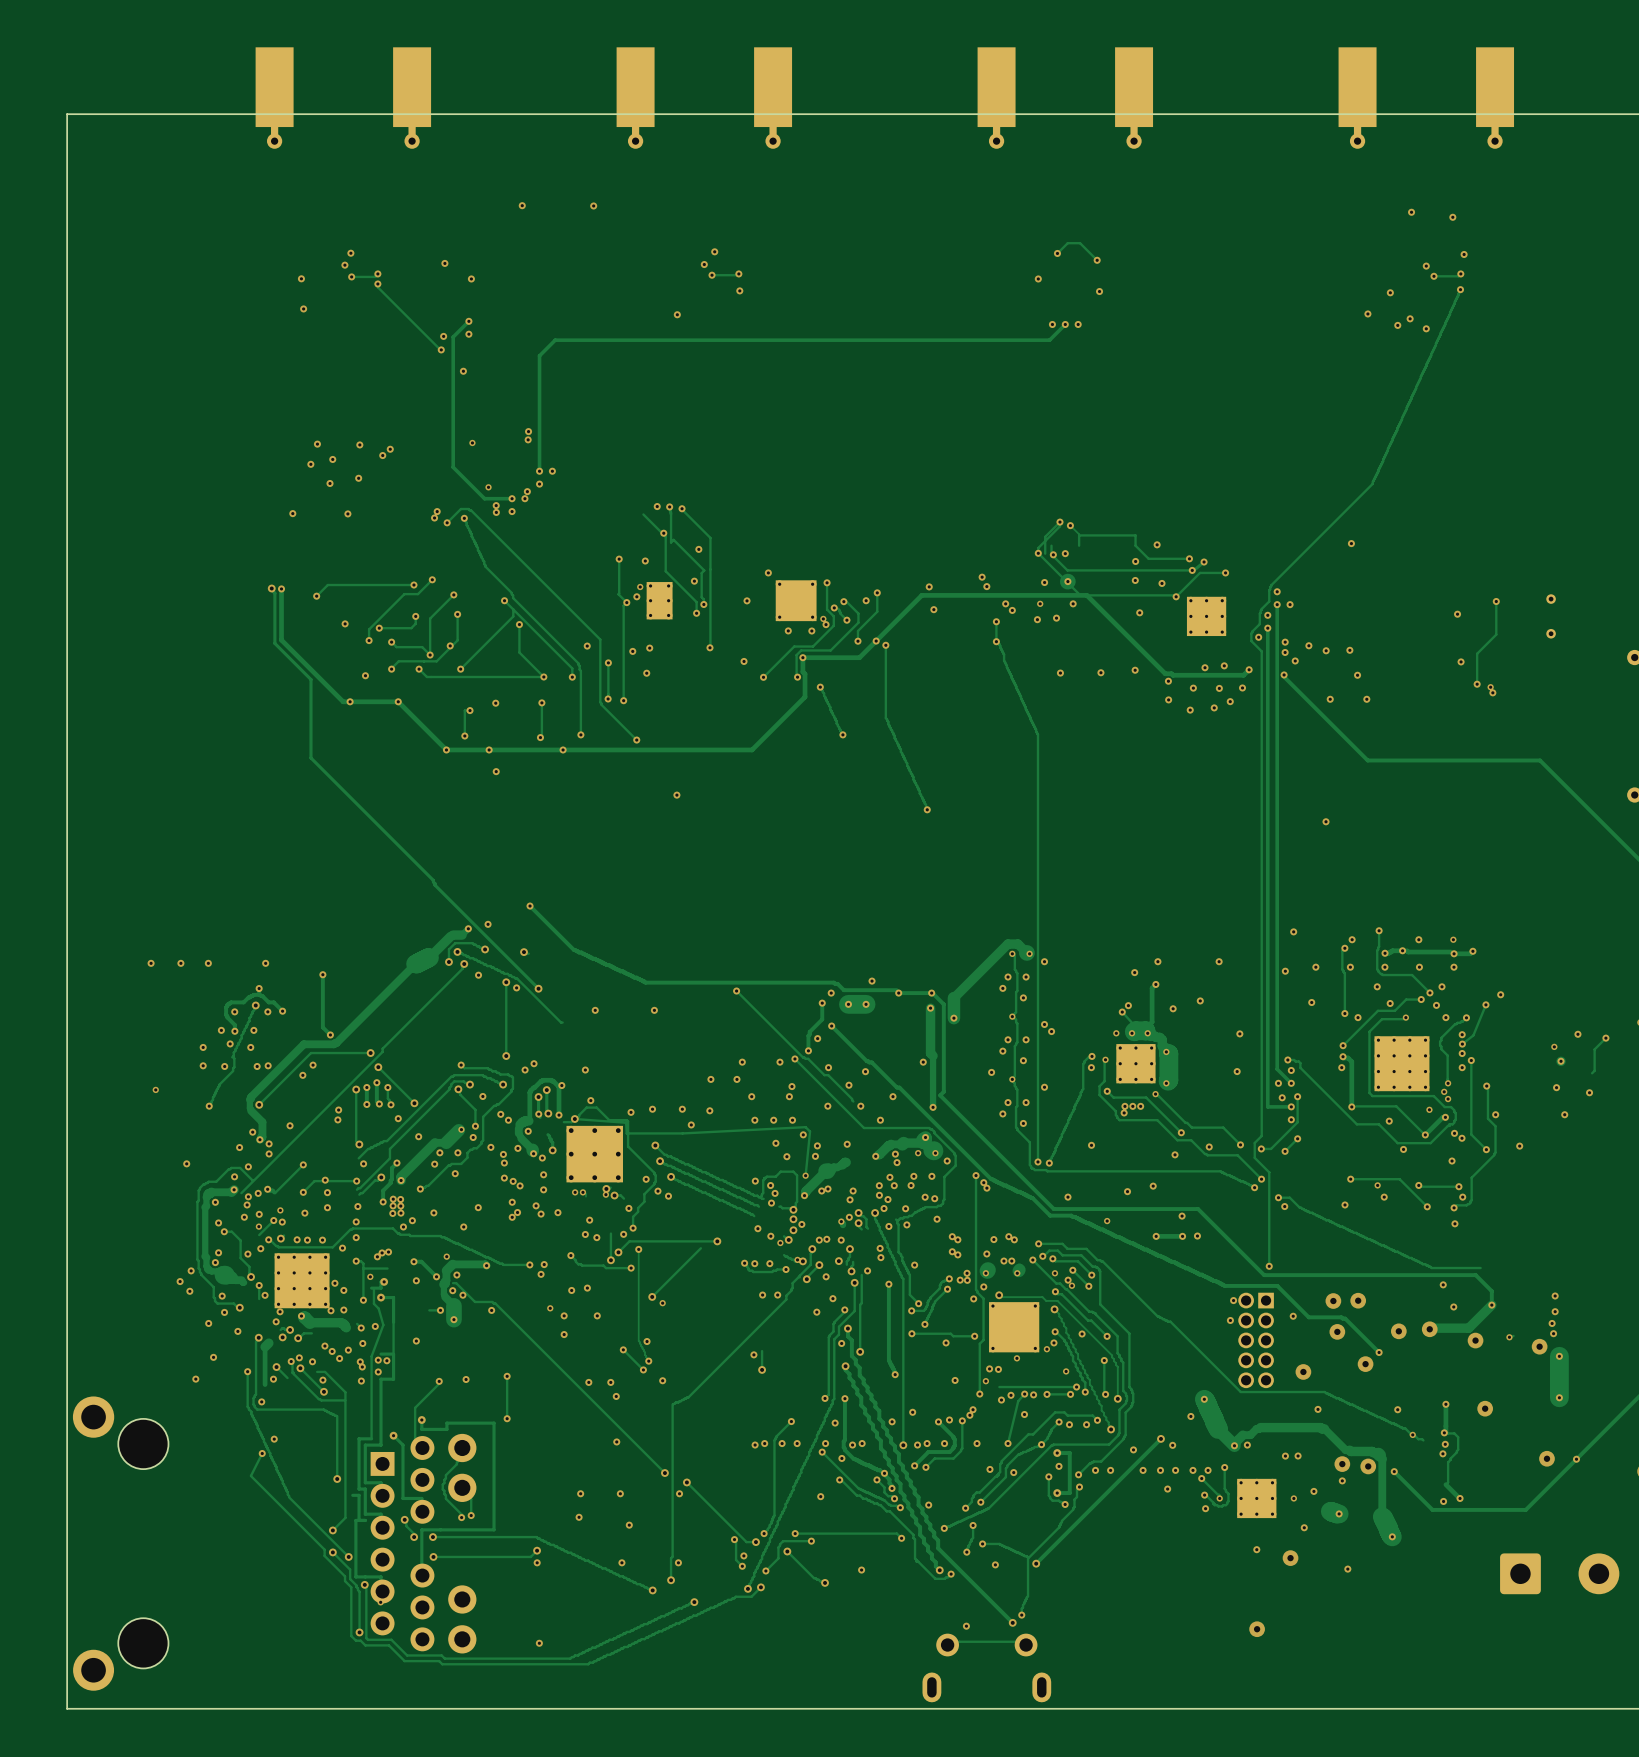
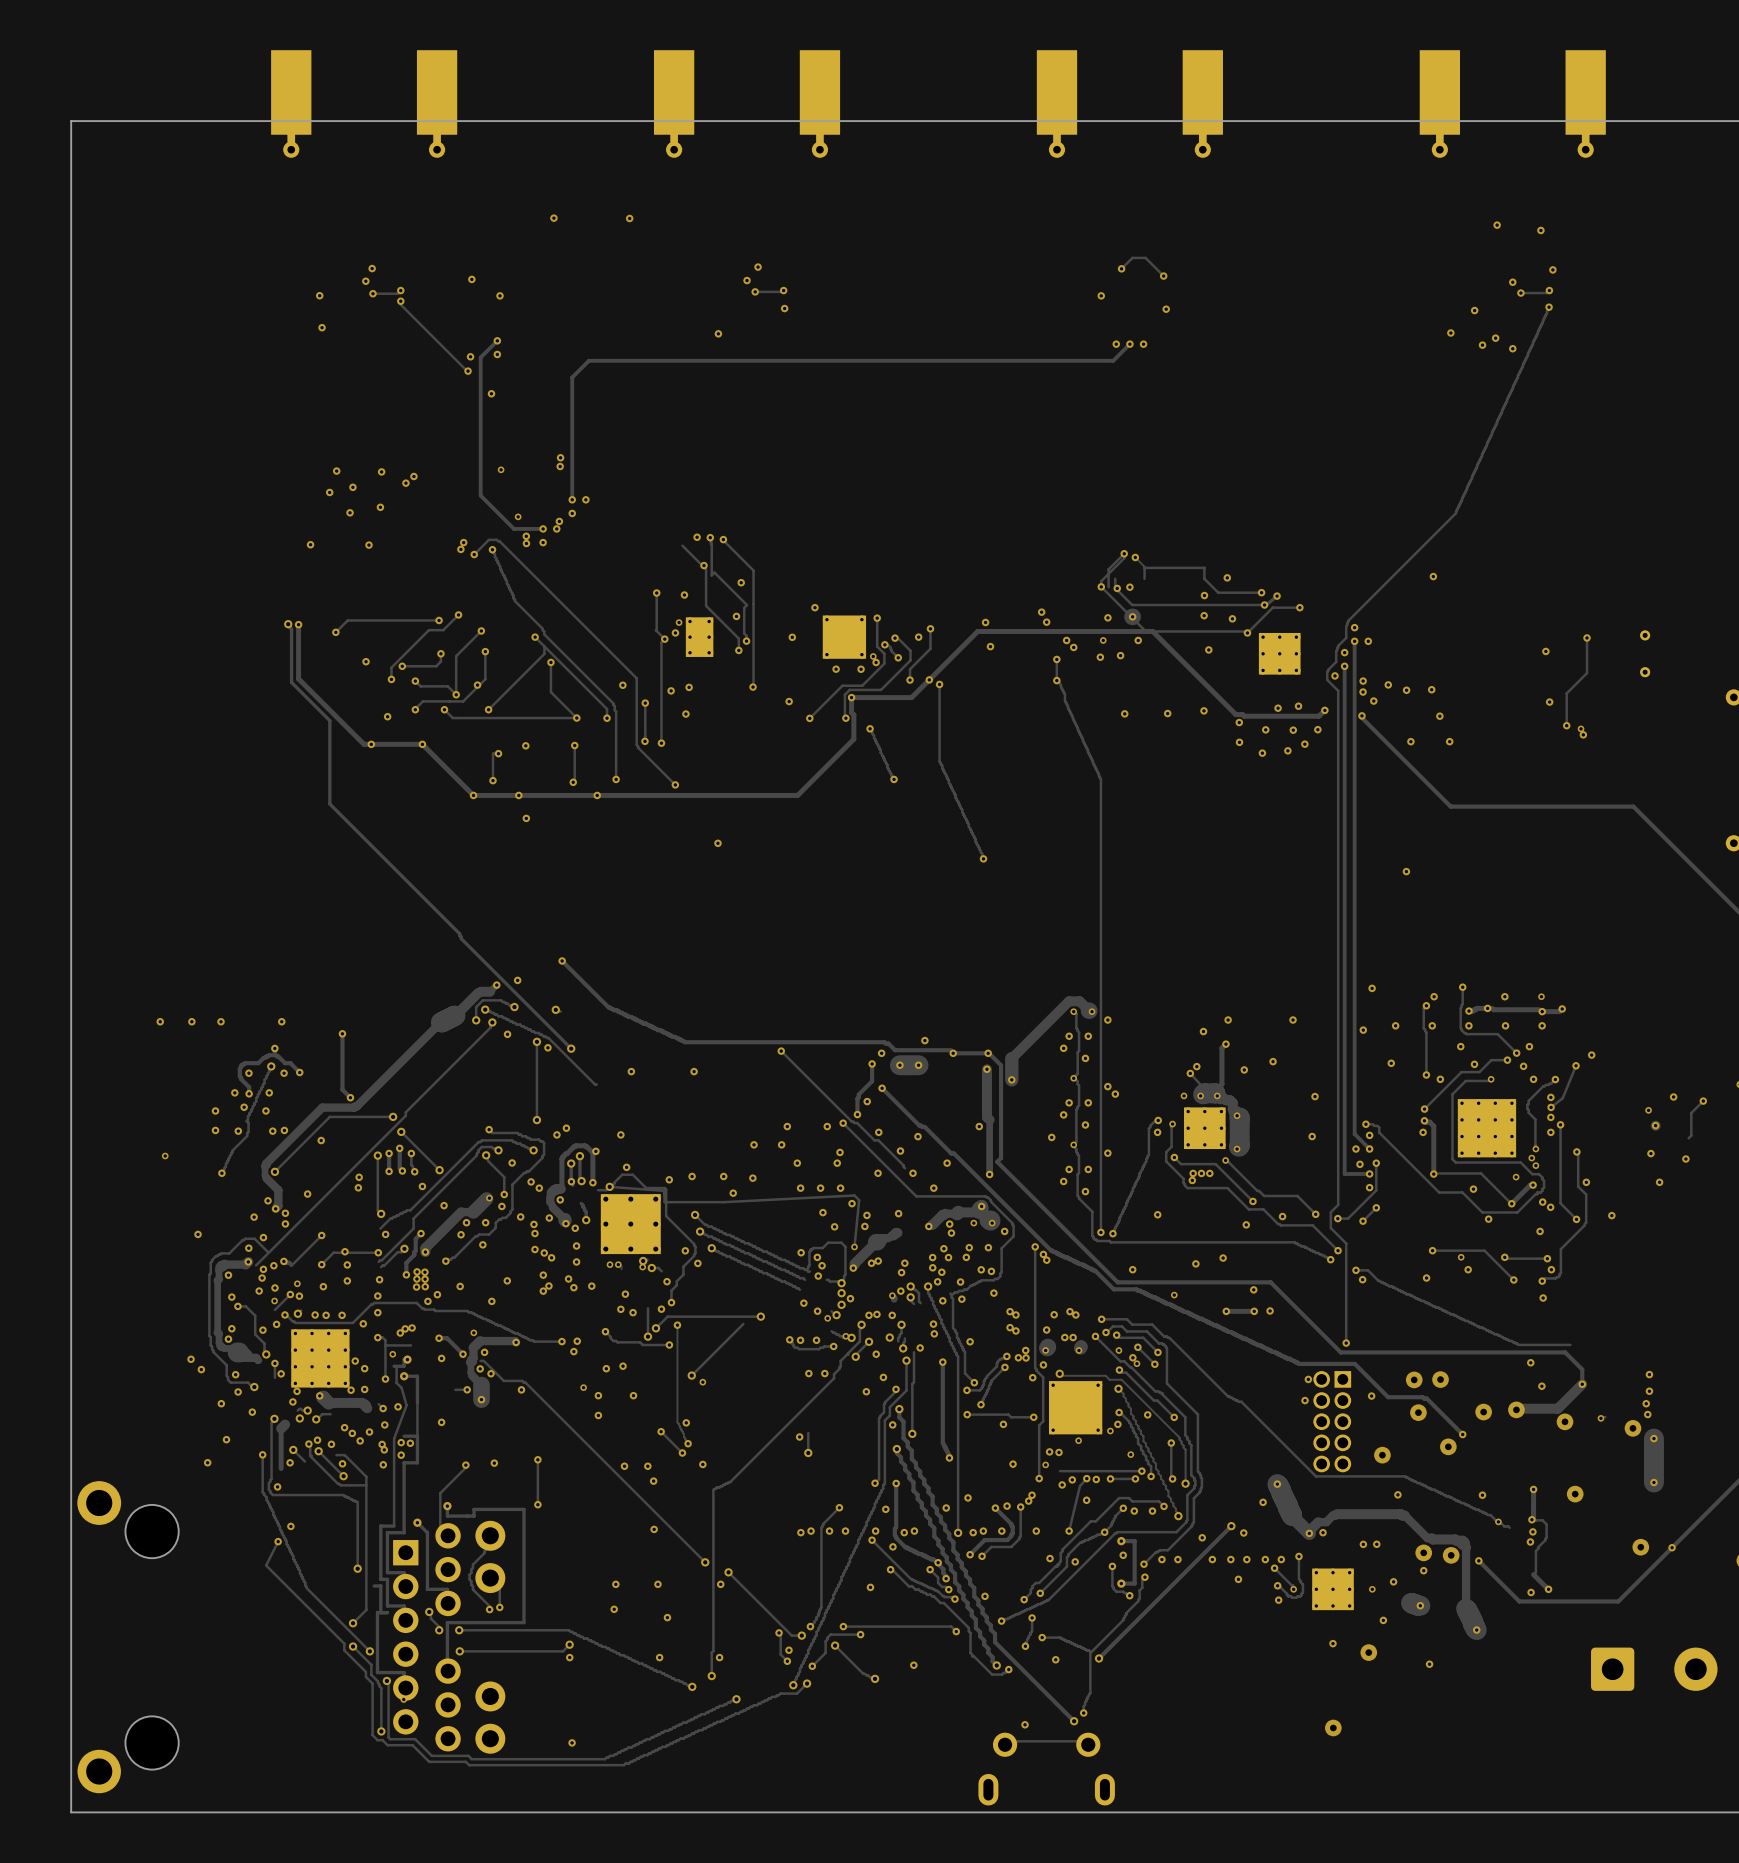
via: (313, 1065) -> none
via: (668, 1196) -> none
via: (191, 1270) -> none

